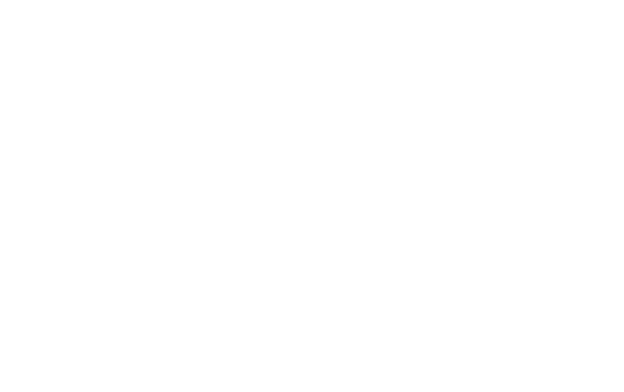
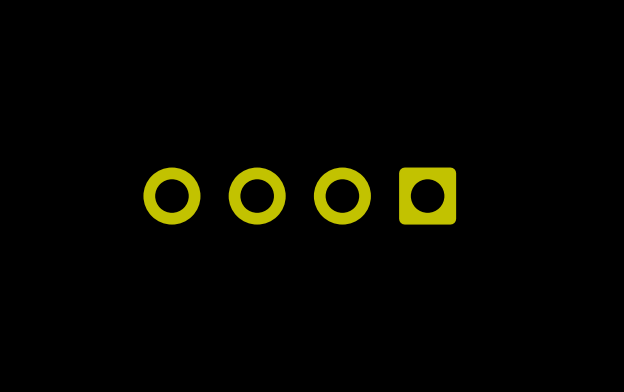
part: none -> (299, 196)

